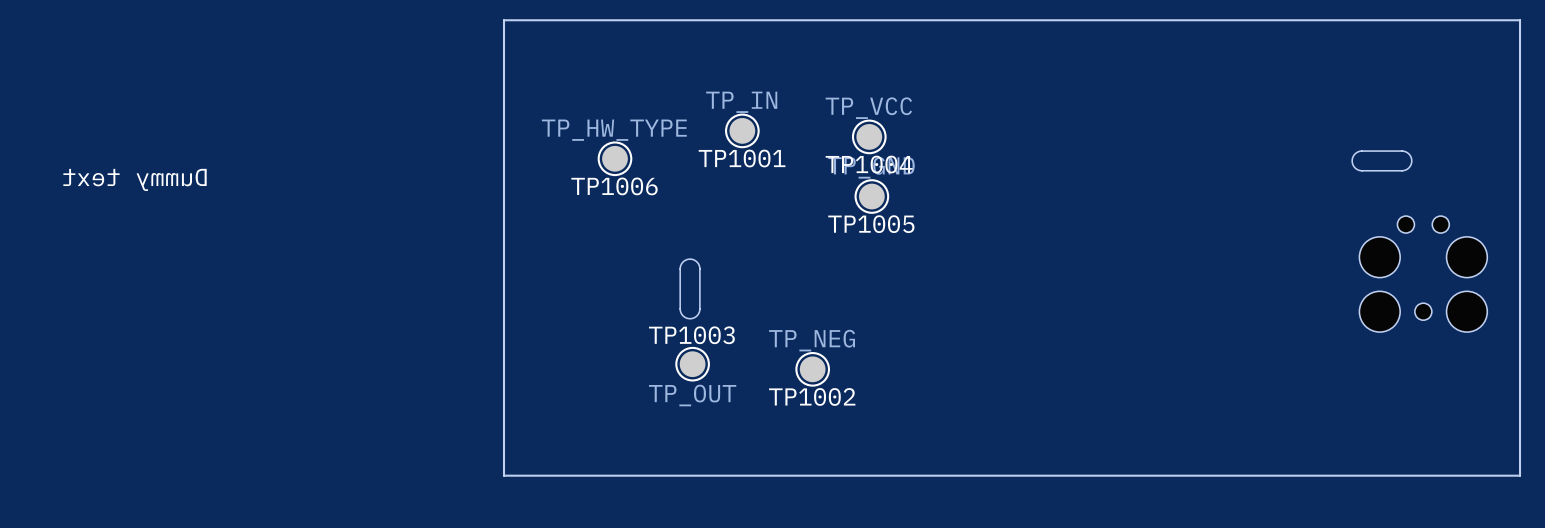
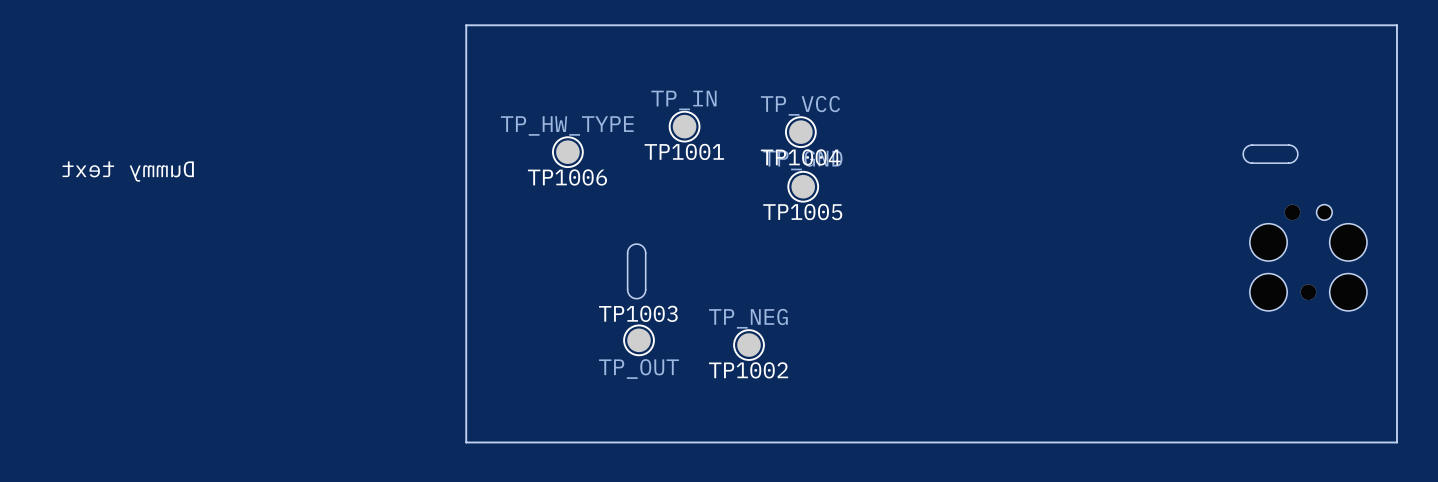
part footprint: [1359, 216, 1488, 333] -> [1249, 204, 1368, 311]

